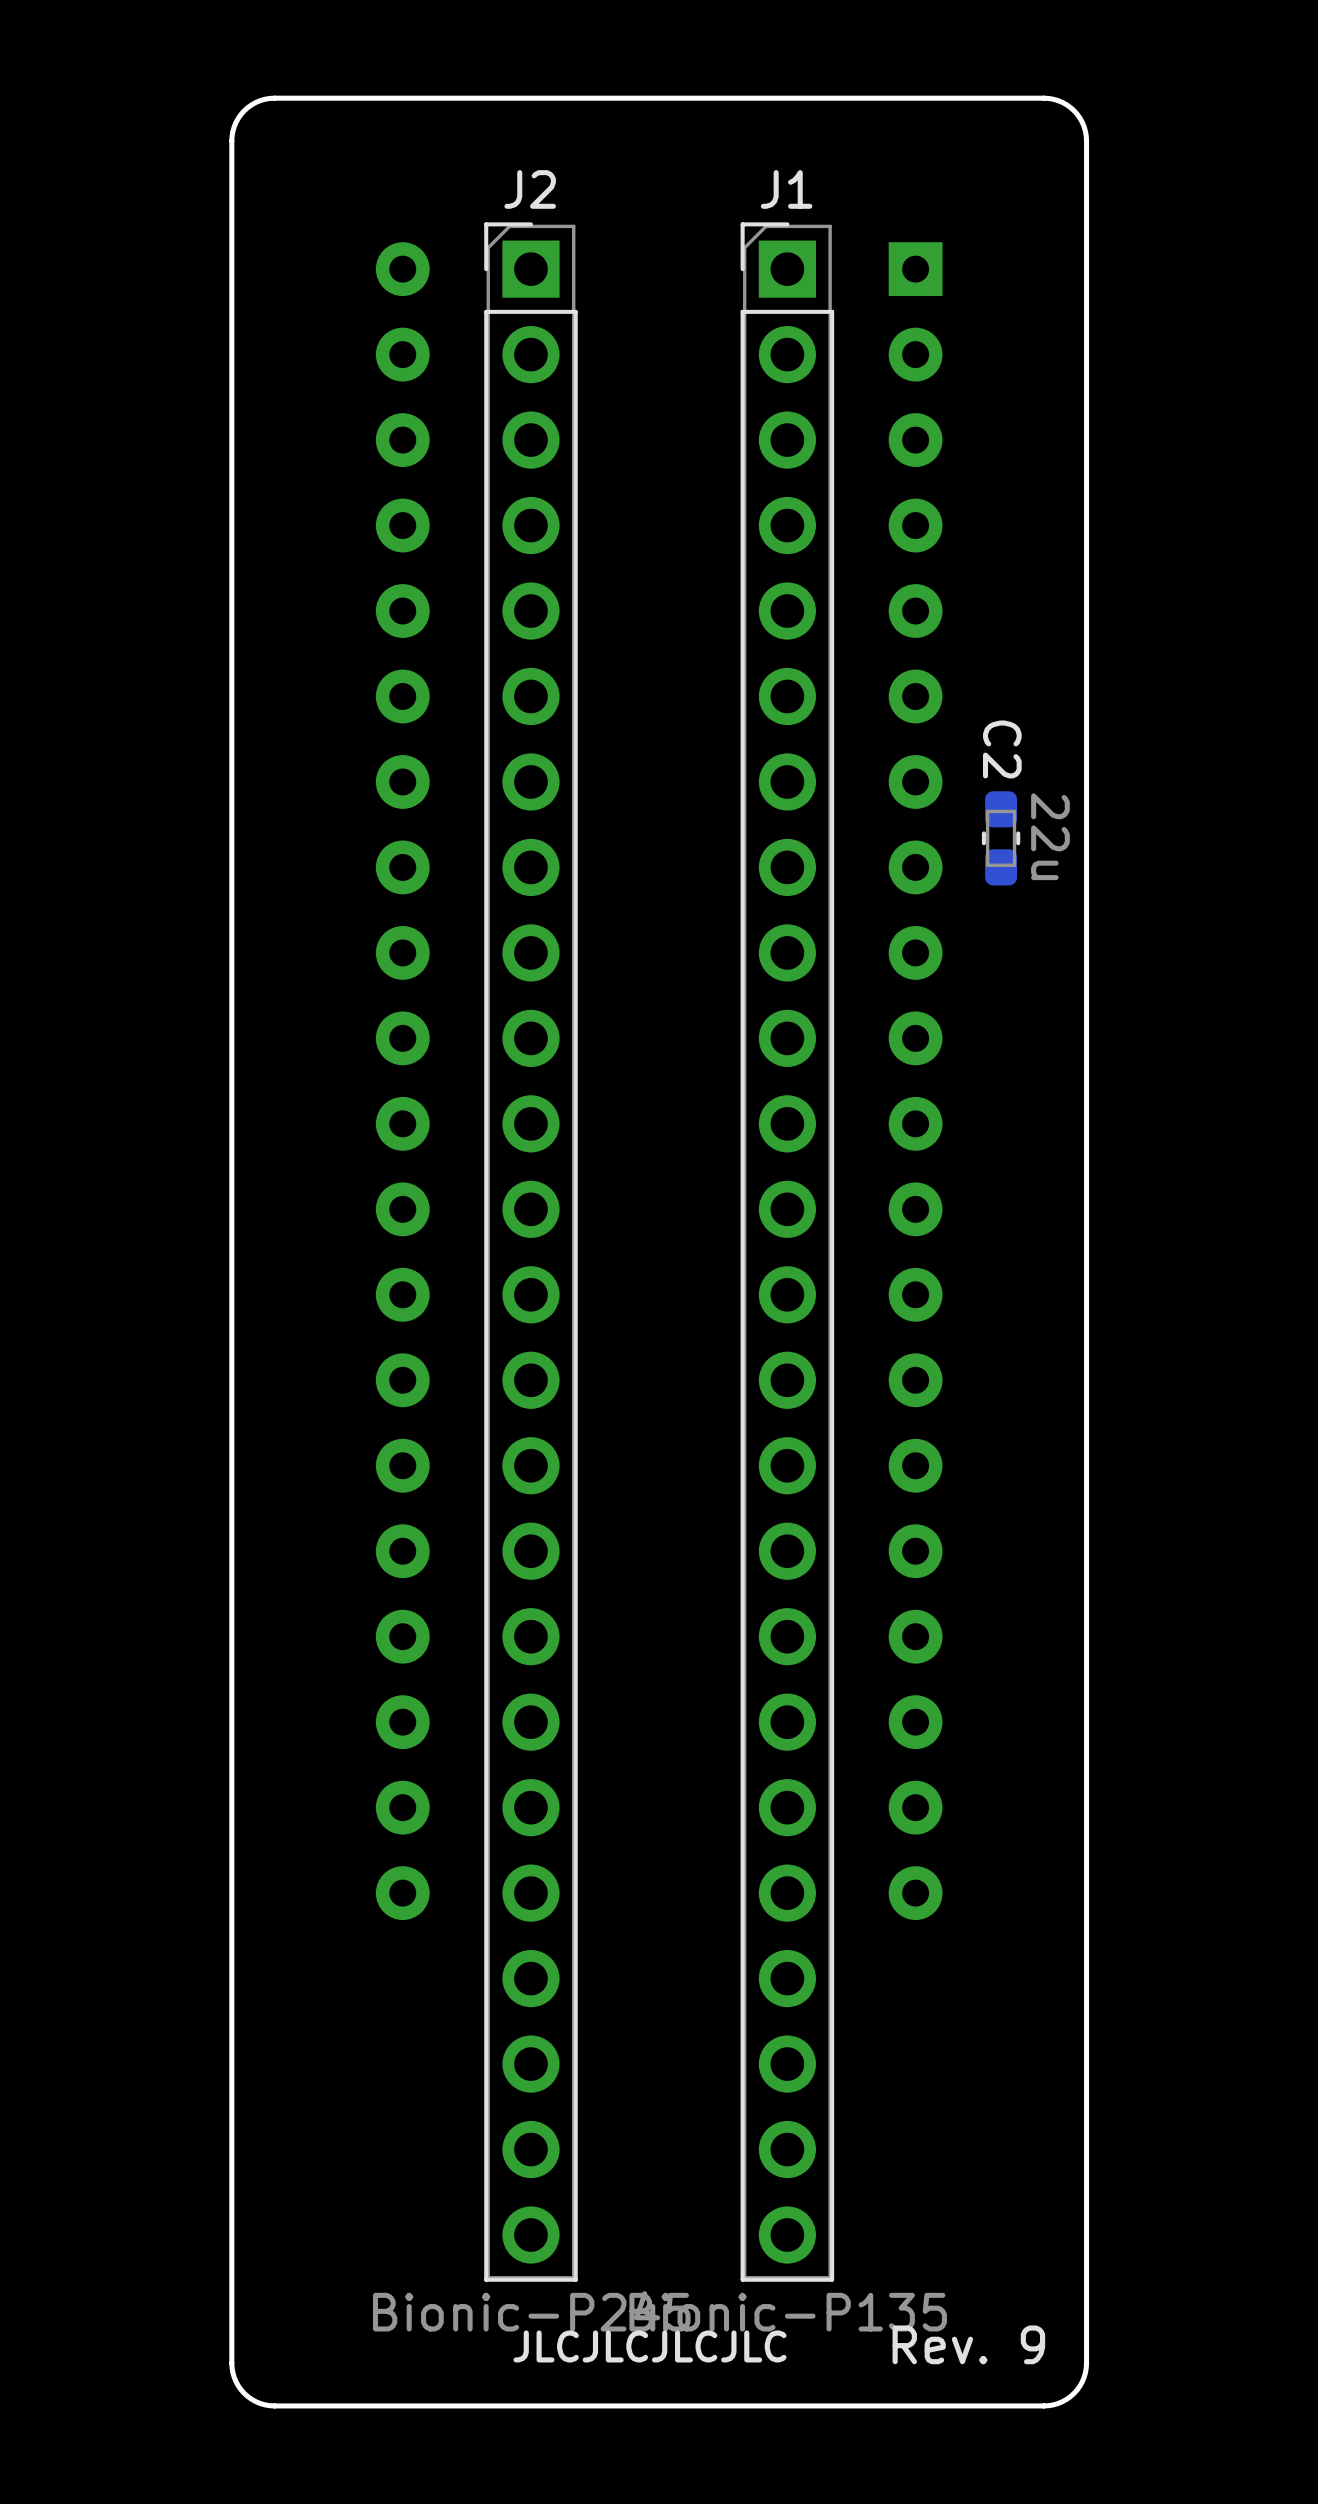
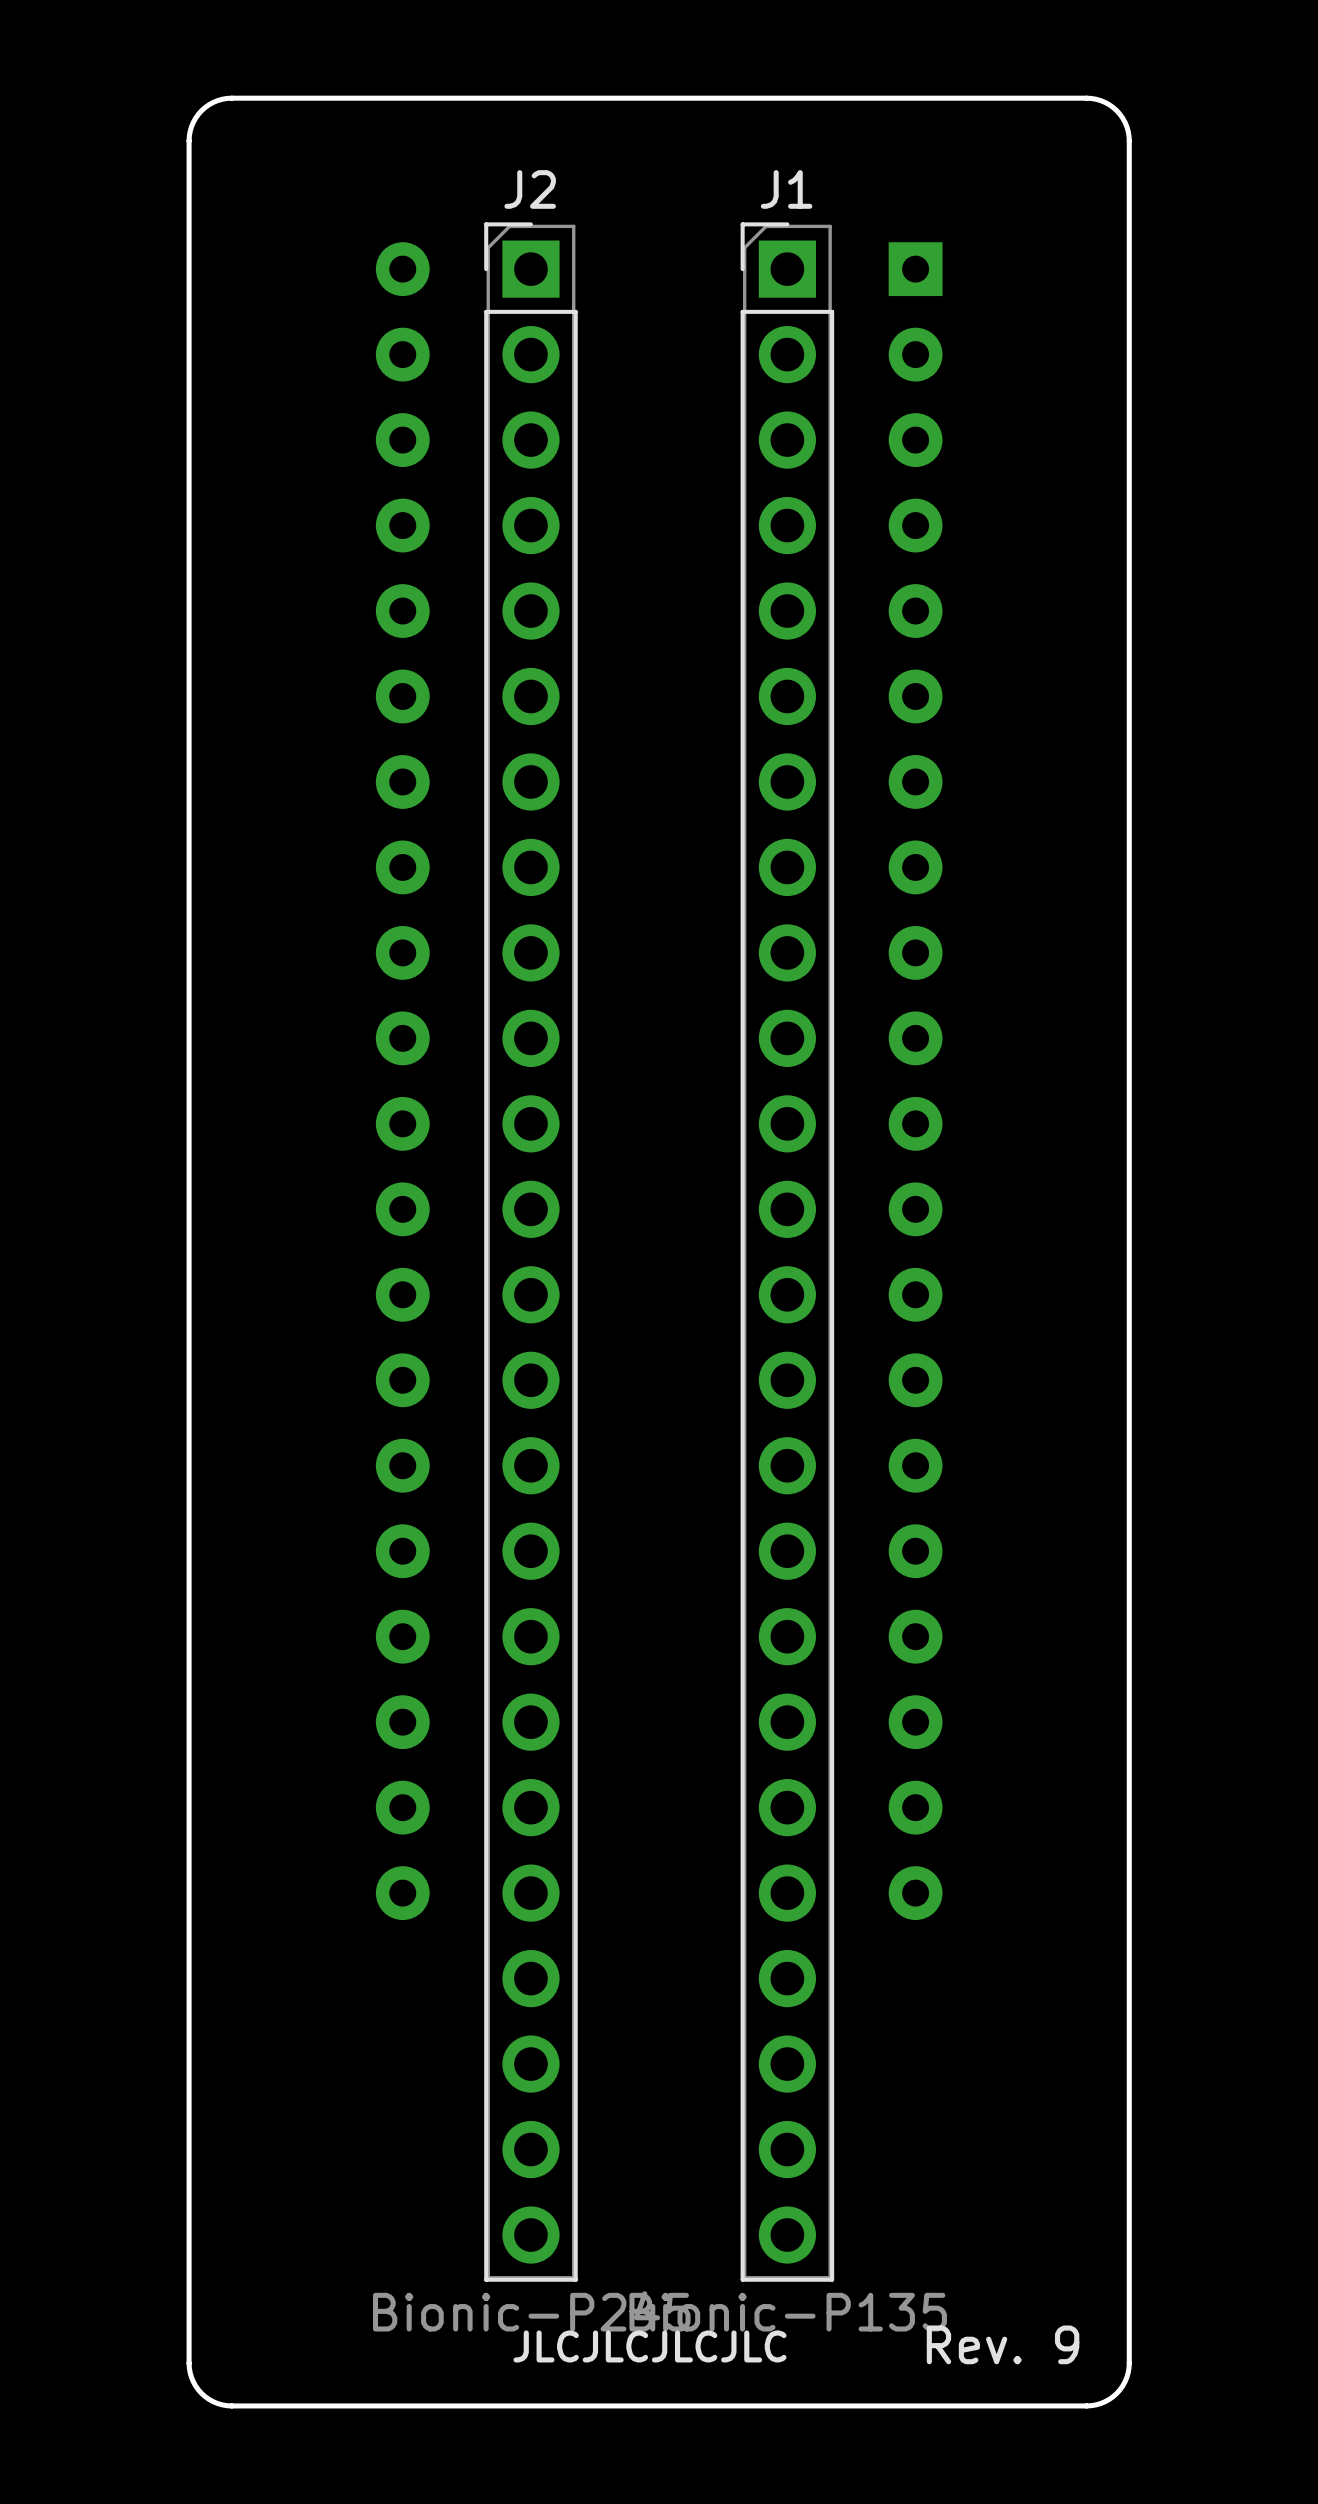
board edge: (274, 98) (260, 100) (244, 110) (234, 126) (231, 140) (231, 2363) (234, 2377) (244, 2393) (260, 2403) (274, 2405) -> (274, 98) (227, 98) (213, 102) (205, 107) (195, 118) (190, 131) (189, 140) (189, 2363) (190, 2372) (195, 2385) (205, 2396) (213, 2401) (227, 2405) (274, 2405)
board edge: (1043, 98) (1057, 100) (1074, 110) (1084, 126) (1086, 140) (1086, 2363) (1084, 2377) (1074, 2393) (1057, 2403) (1043, 2405) -> (1043, 98) (1091, 98) (1105, 102) (1113, 107) (1122, 118) (1128, 131) (1129, 140) (1129, 2363) (1128, 2372) (1122, 2385) (1116, 2393) (1105, 2401) (1091, 2405) (1043, 2405)
C2: 22u (1001, 838) -> none
text position: Rev. 9 (968, 2344) -> Rev. 9 (1003, 2344)

